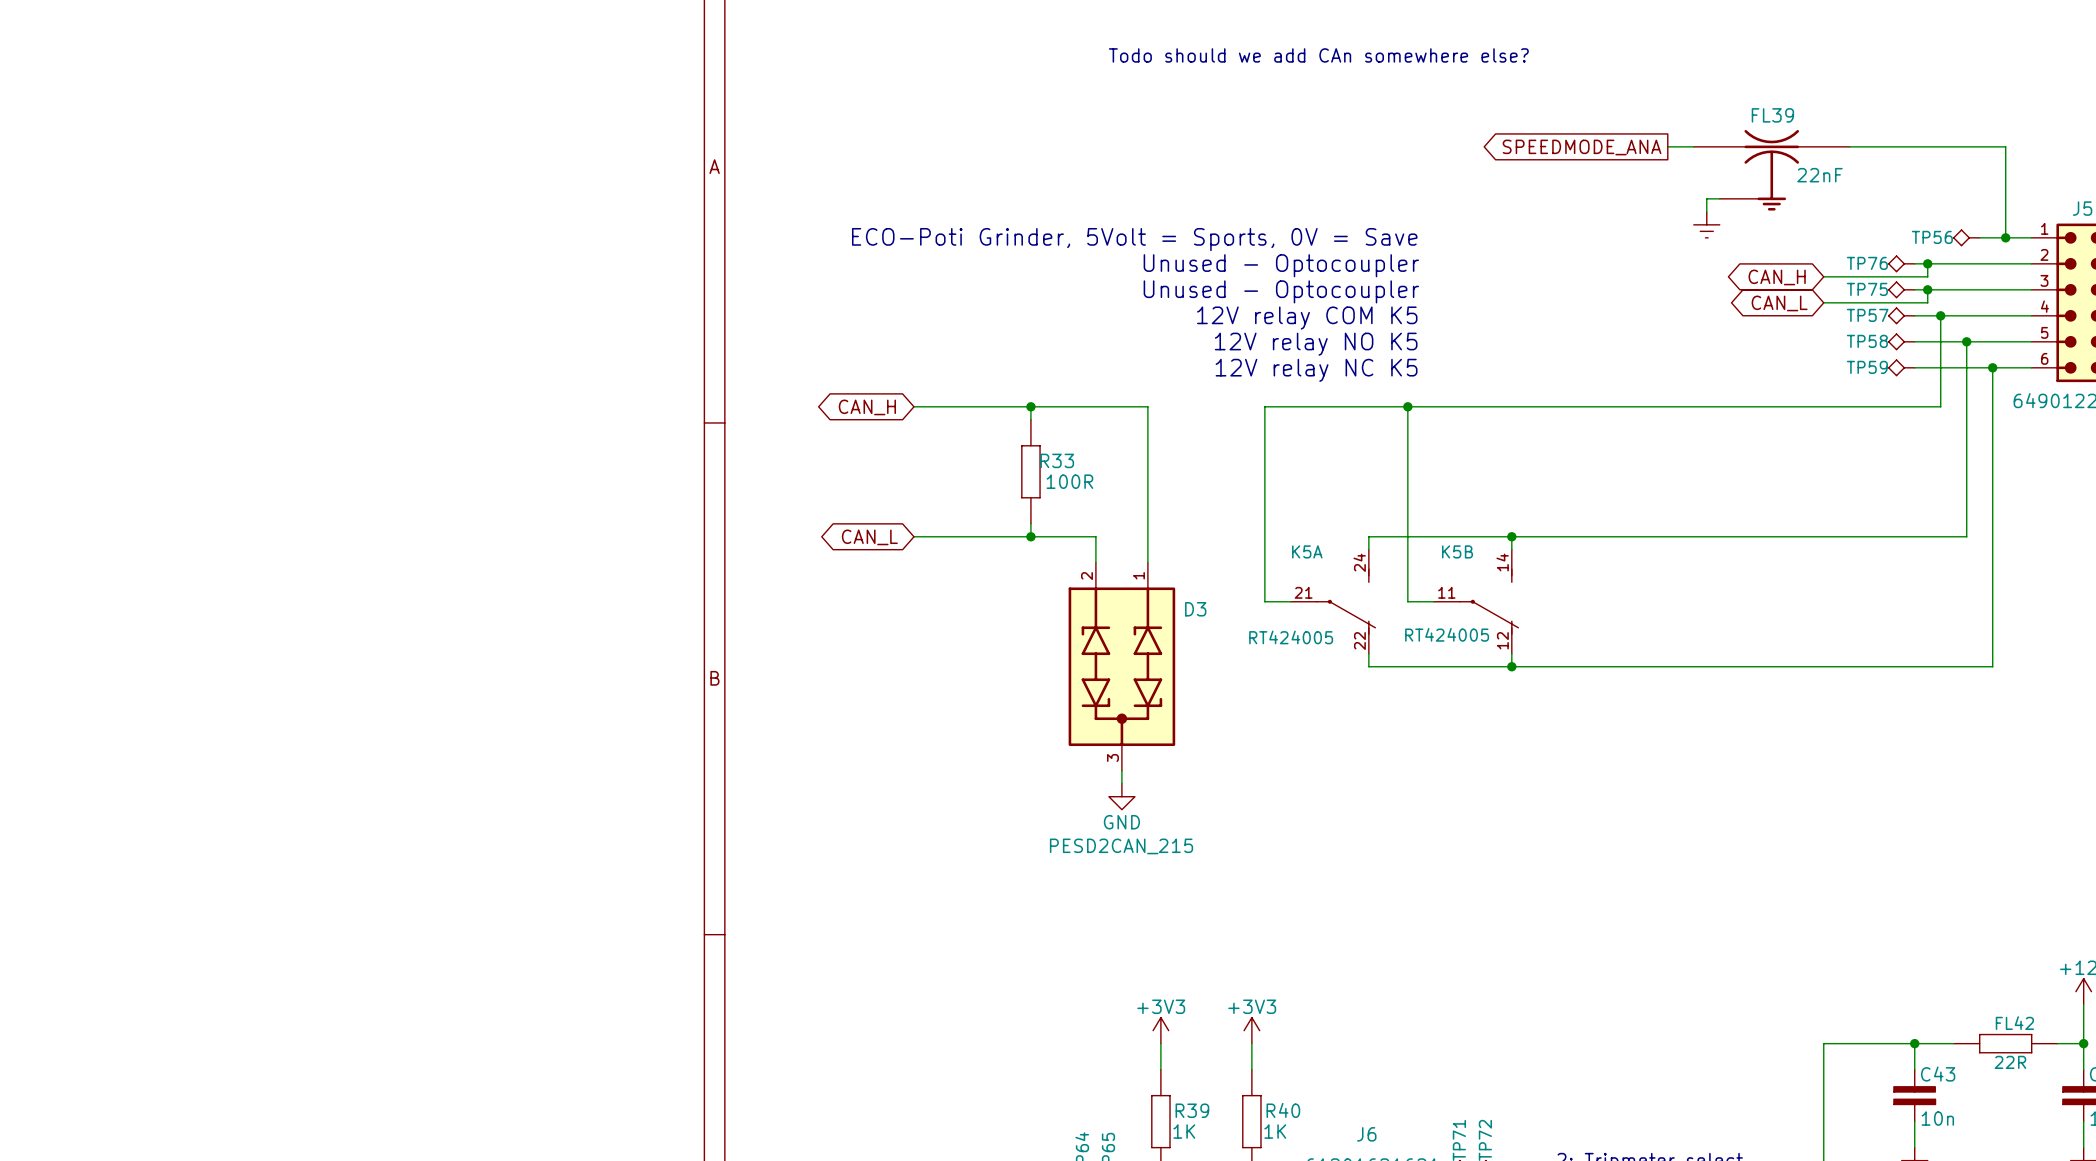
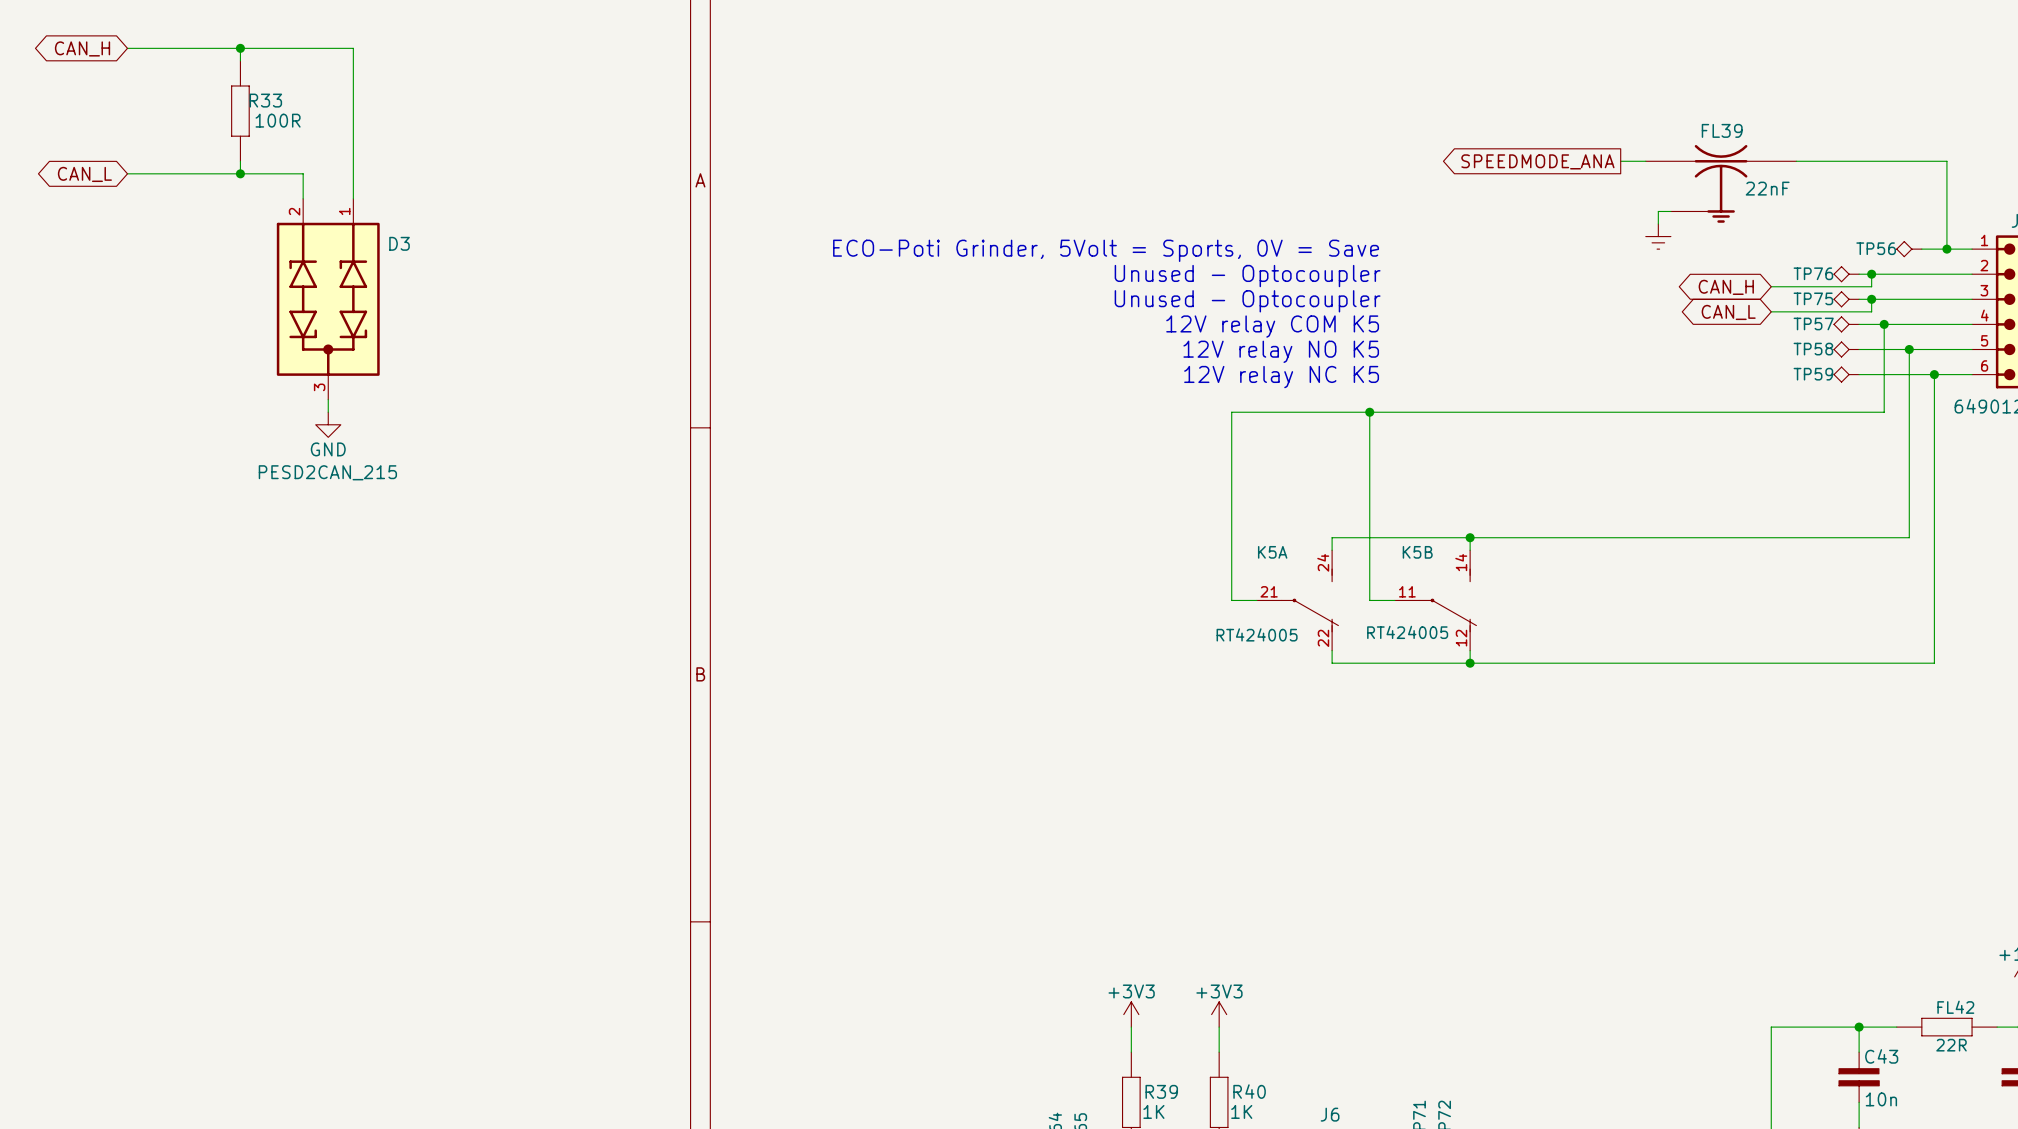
wire: none -> (127, 48) (353, 48) (353, 198)
wire: none -> (240, 48) (240, 60)
junction: none -> (240, 48)
global label: none -> CAN_H (82, 48)
text: Todo should we add CAn somewhere else? (1318, 55) -> none
wire: none -> (240, 161) (240, 173)
wire: none -> (127, 173) (303, 173) (303, 198)
junction: none -> (240, 173)
global label: none -> CAN_L (84, 174)
wire: none -> (328, 399) (328, 412)
wire: (913, 406) (1147, 406) (1147, 562) -> none
wire: (1030, 406) (1030, 419) -> none
junction: (1030, 406) -> none
global label: CAN_H (867, 407) -> none
power symbol: none -> GND (328, 424)
R33 position: (1030, 471) -> (240, 111)
wire: (1030, 523) (1030, 536) -> none
wire: (913, 536) (1095, 536) (1095, 562) -> none
junction: (1030, 536) -> none
global label: CAN_L (869, 537) -> none
D3 position: (1121, 666) -> (328, 299)
wire: (1121, 770) (1121, 783) -> none
power symbol: GND (1121, 796) -> none

